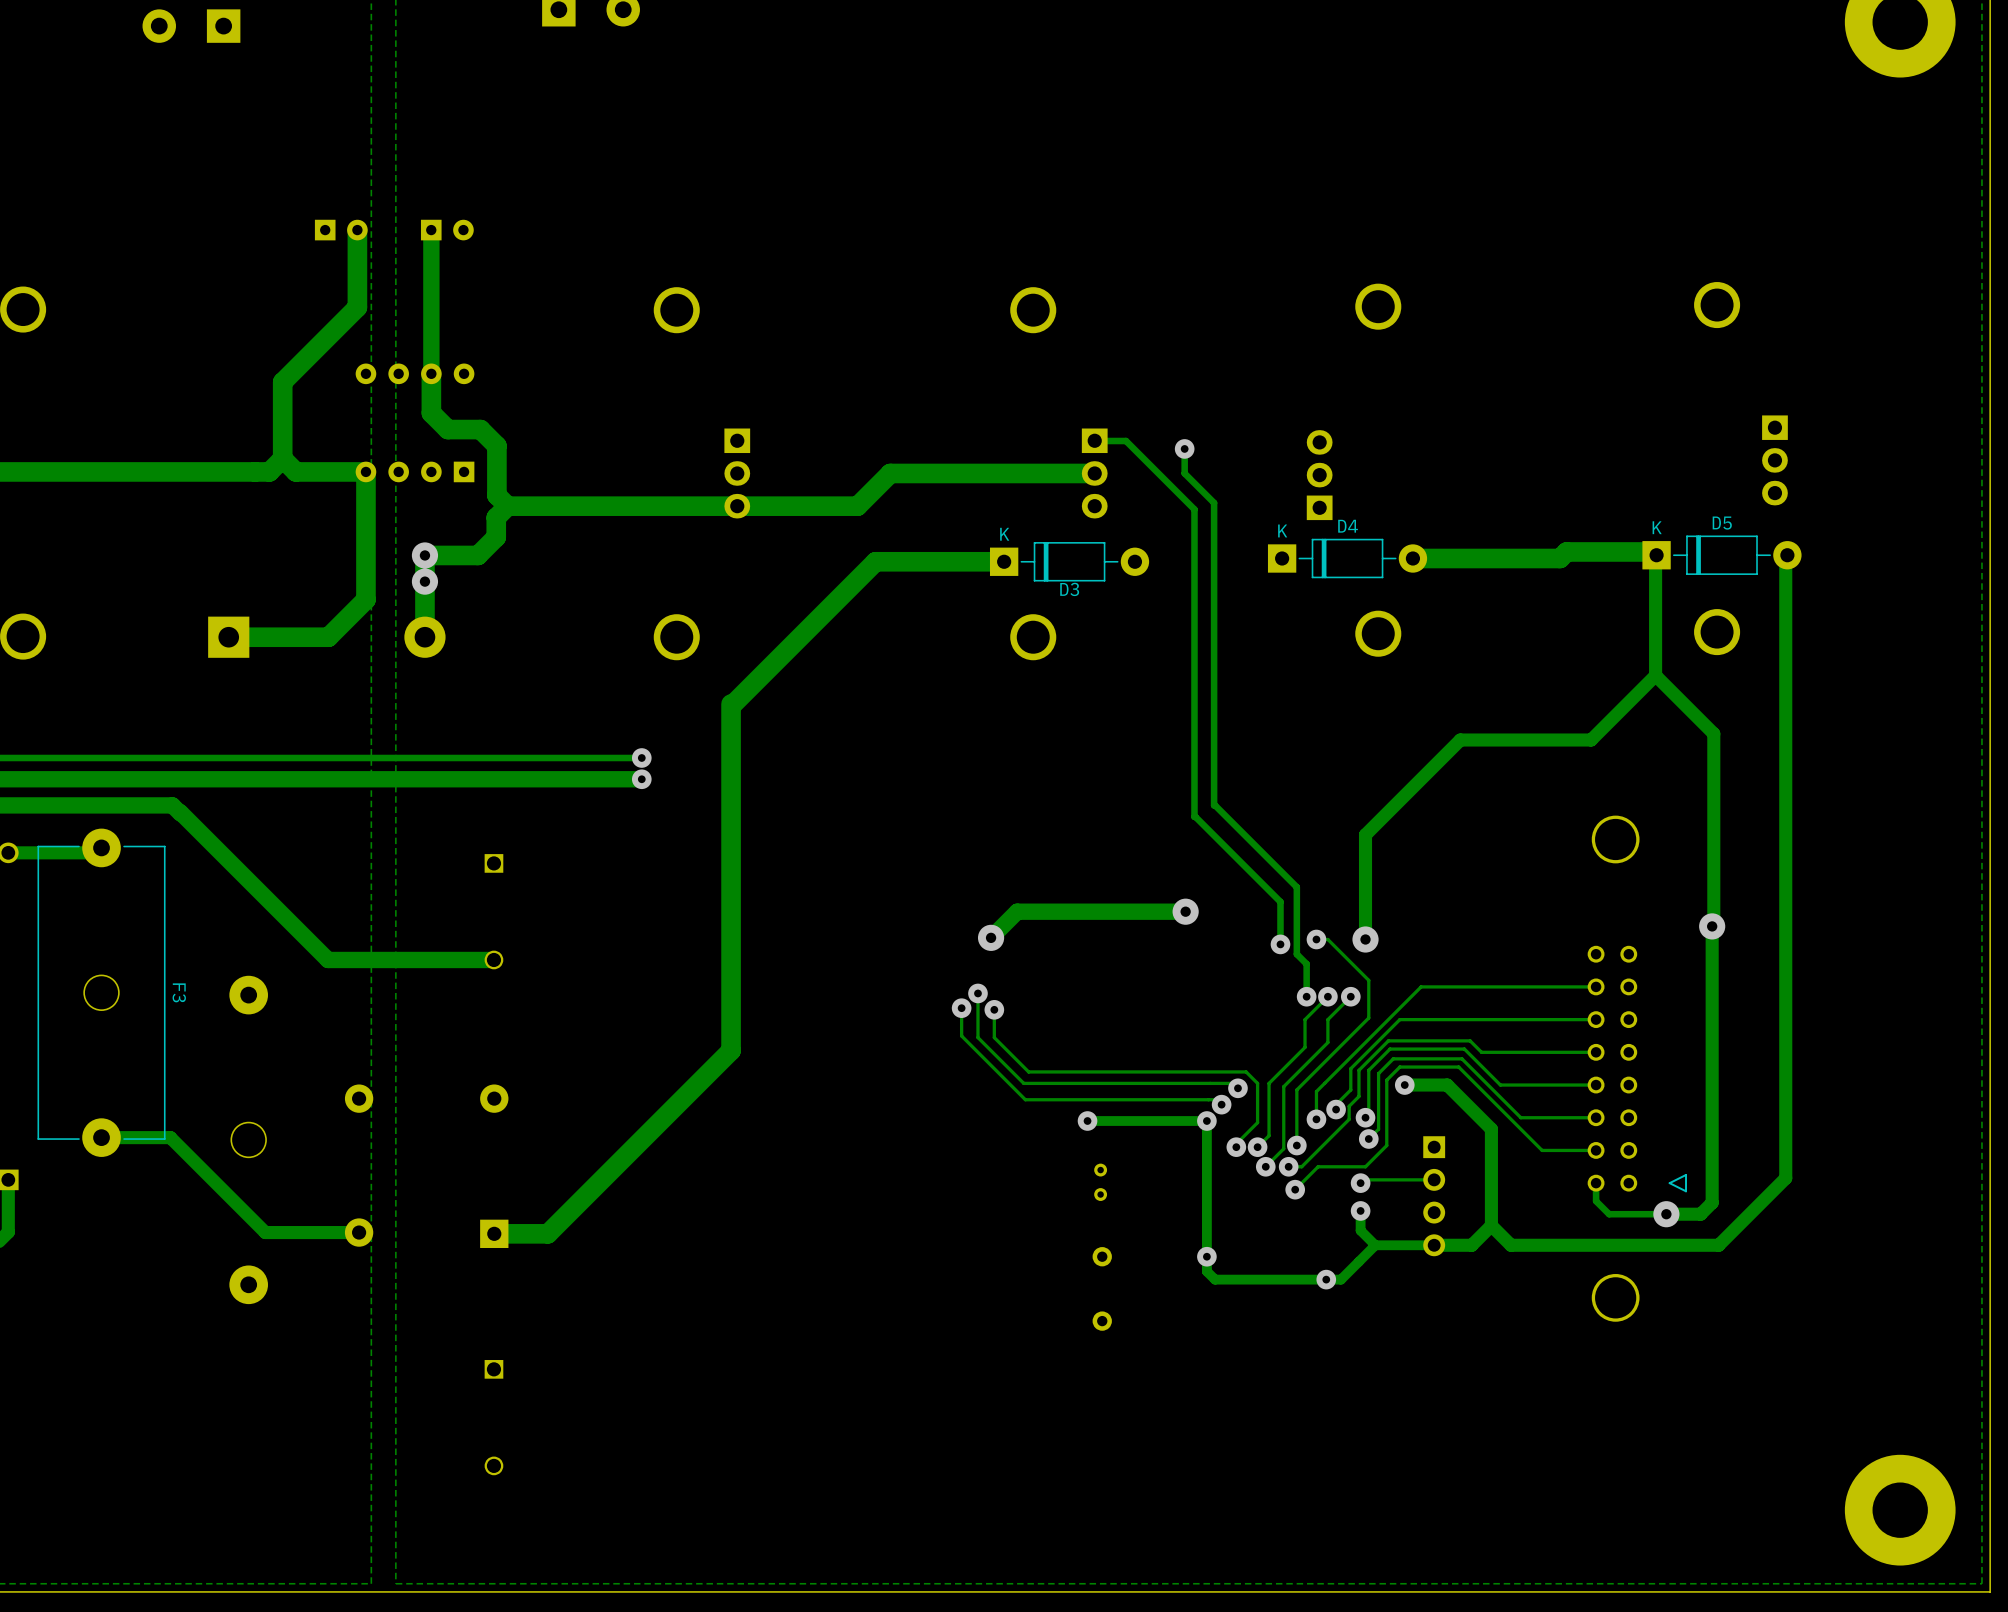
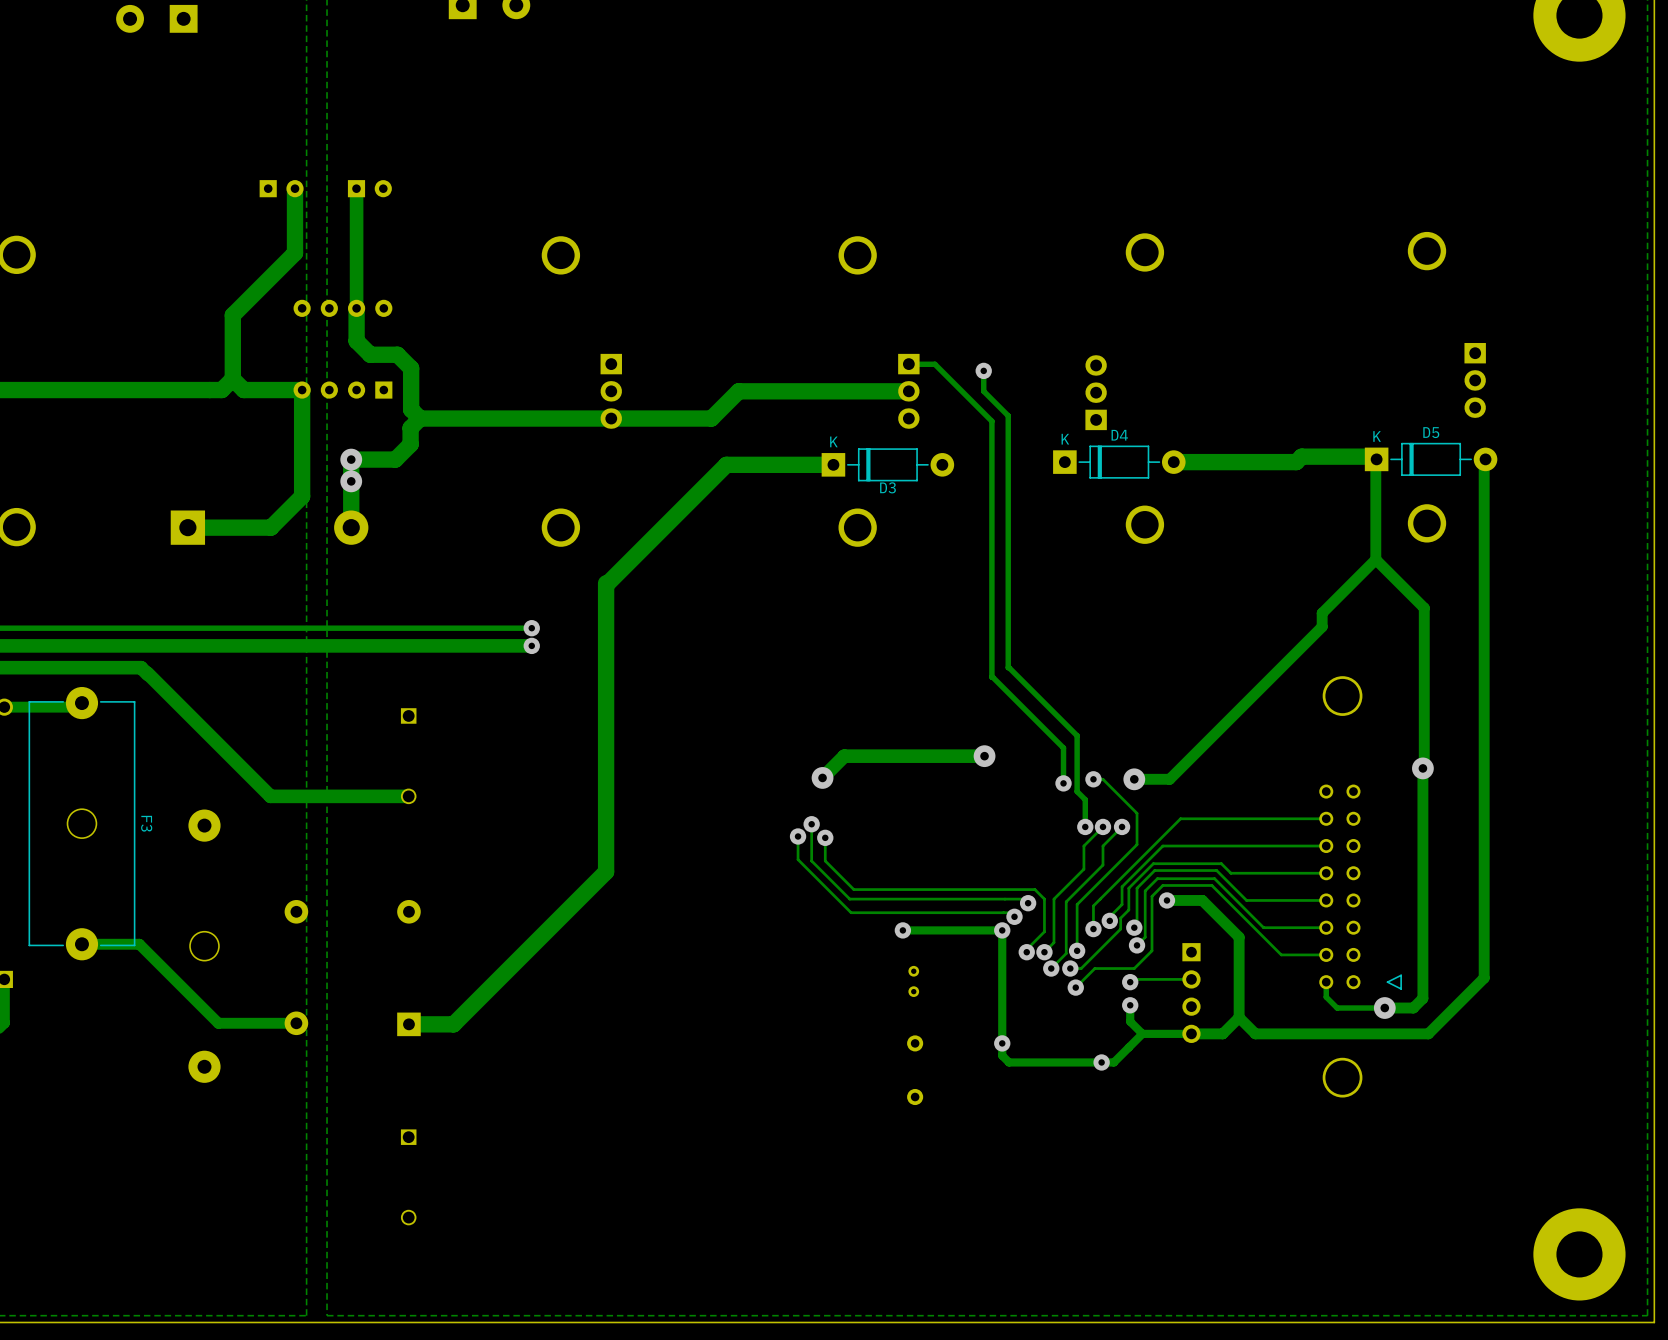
track: (1591, 740) (1460, 740) (1365, 834) (1365, 939) -> (1322, 613) (1322, 626) (1169, 779) (1134, 779)

